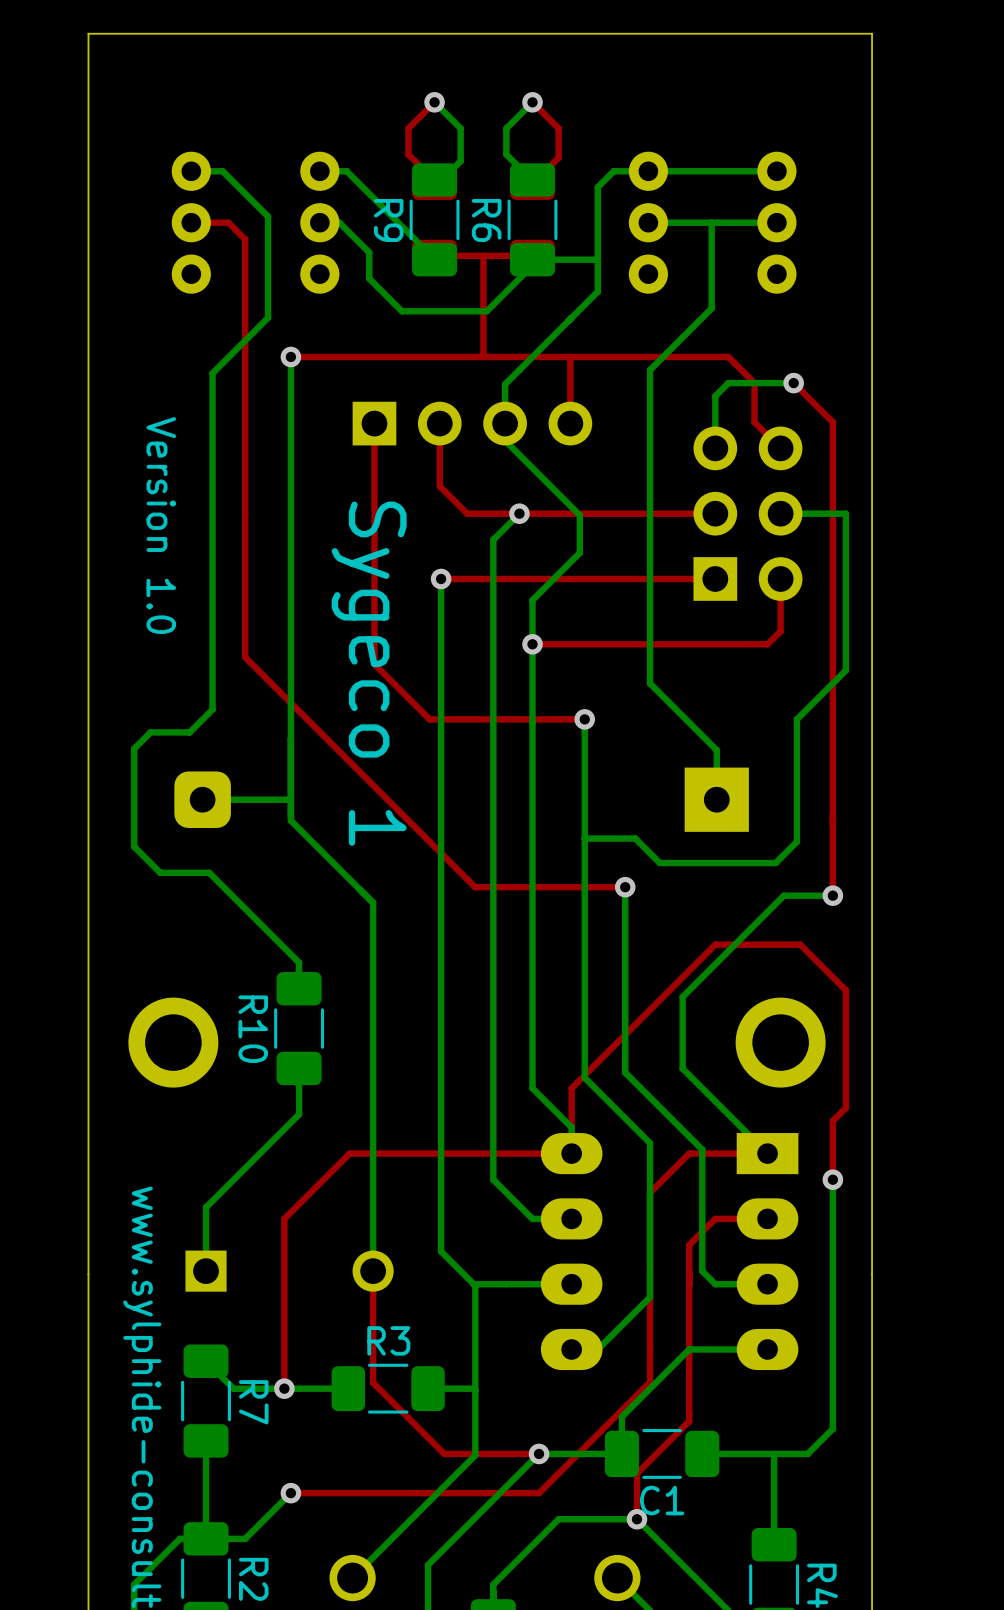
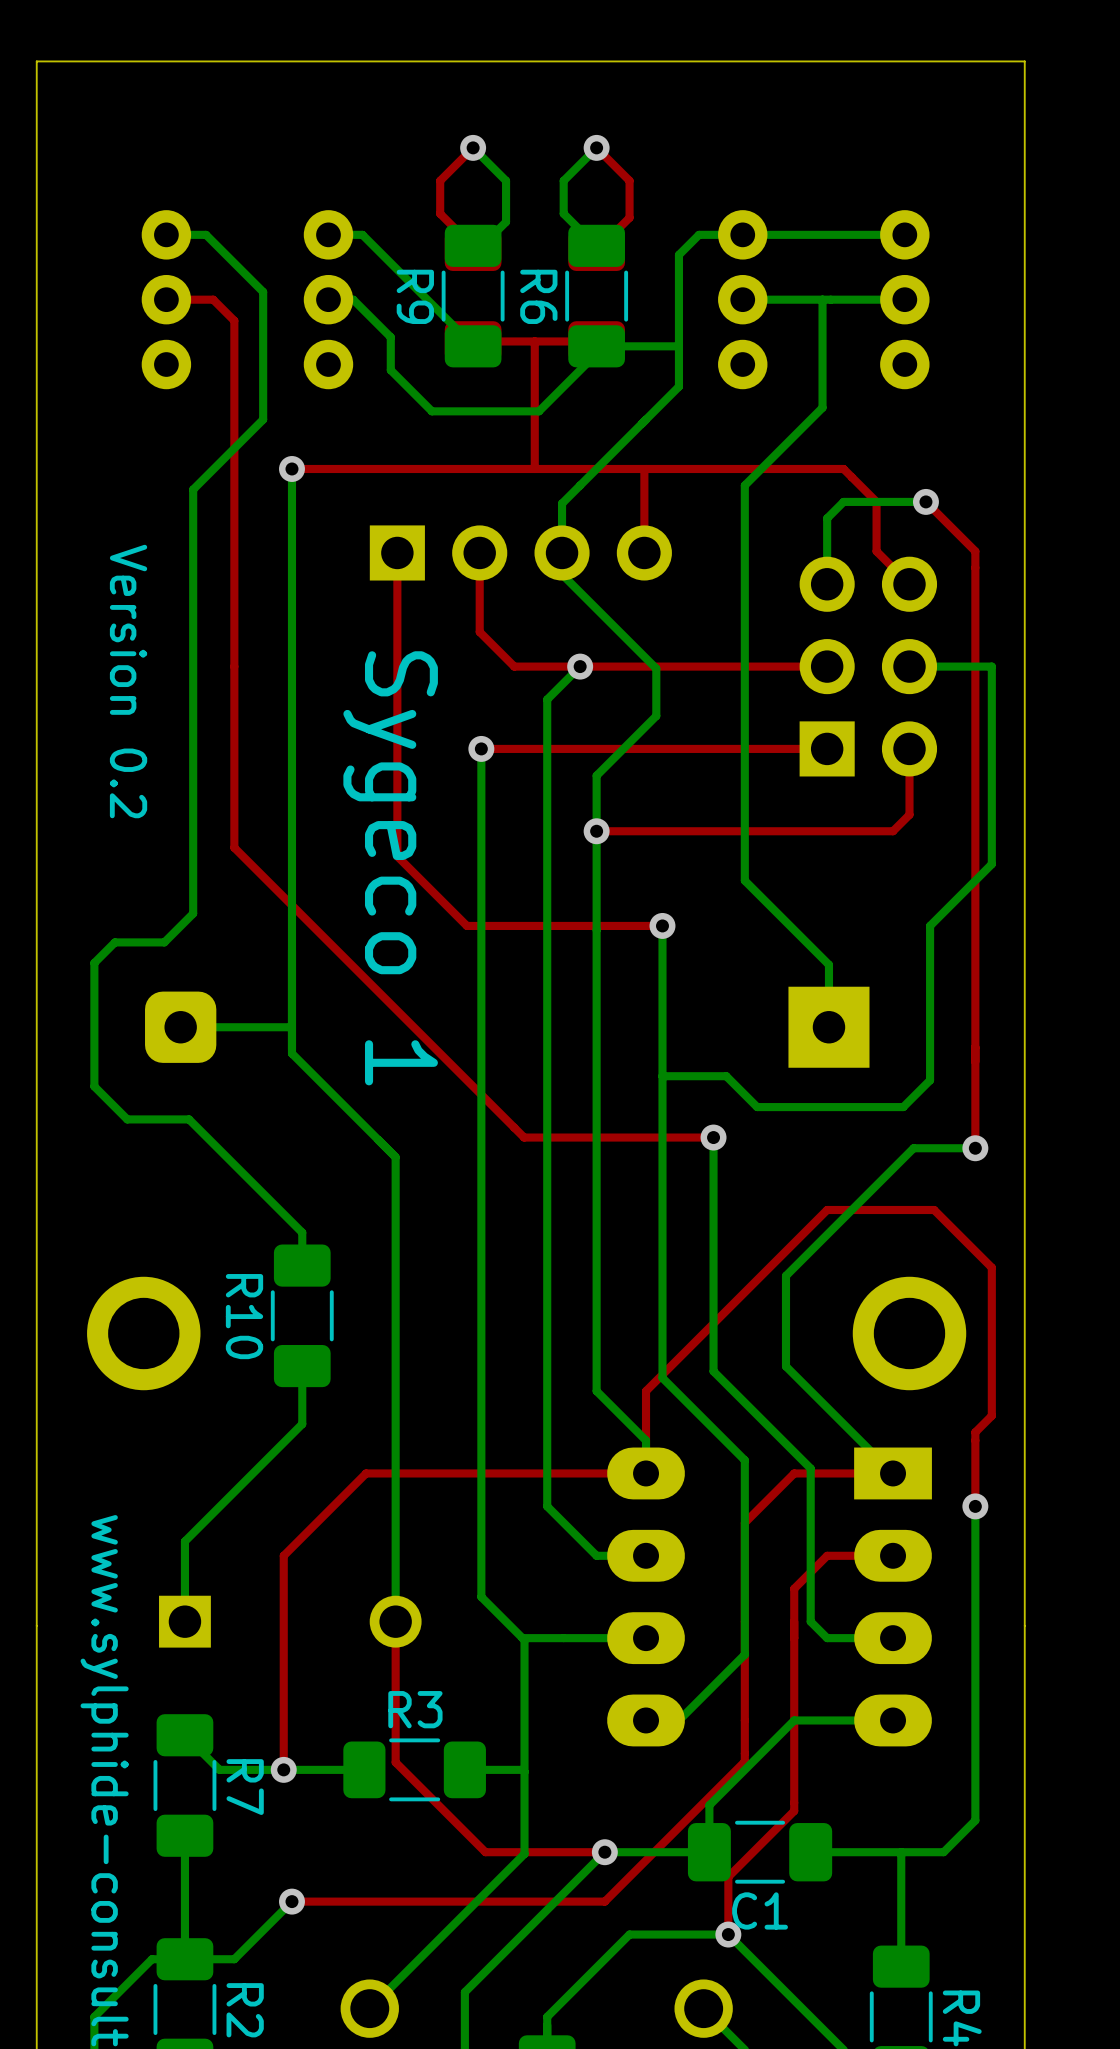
text: Version 1.0 (161, 525) -> Version 0.2 (128, 681)

